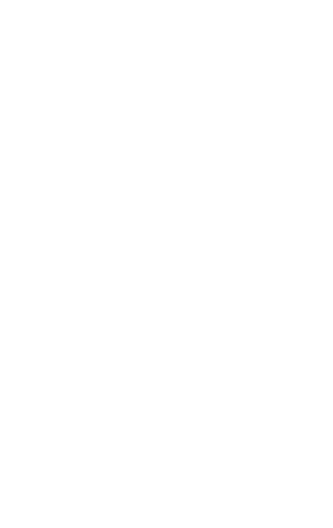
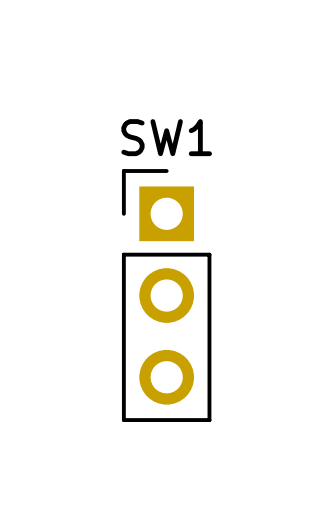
SW1: none -> (166, 295)

